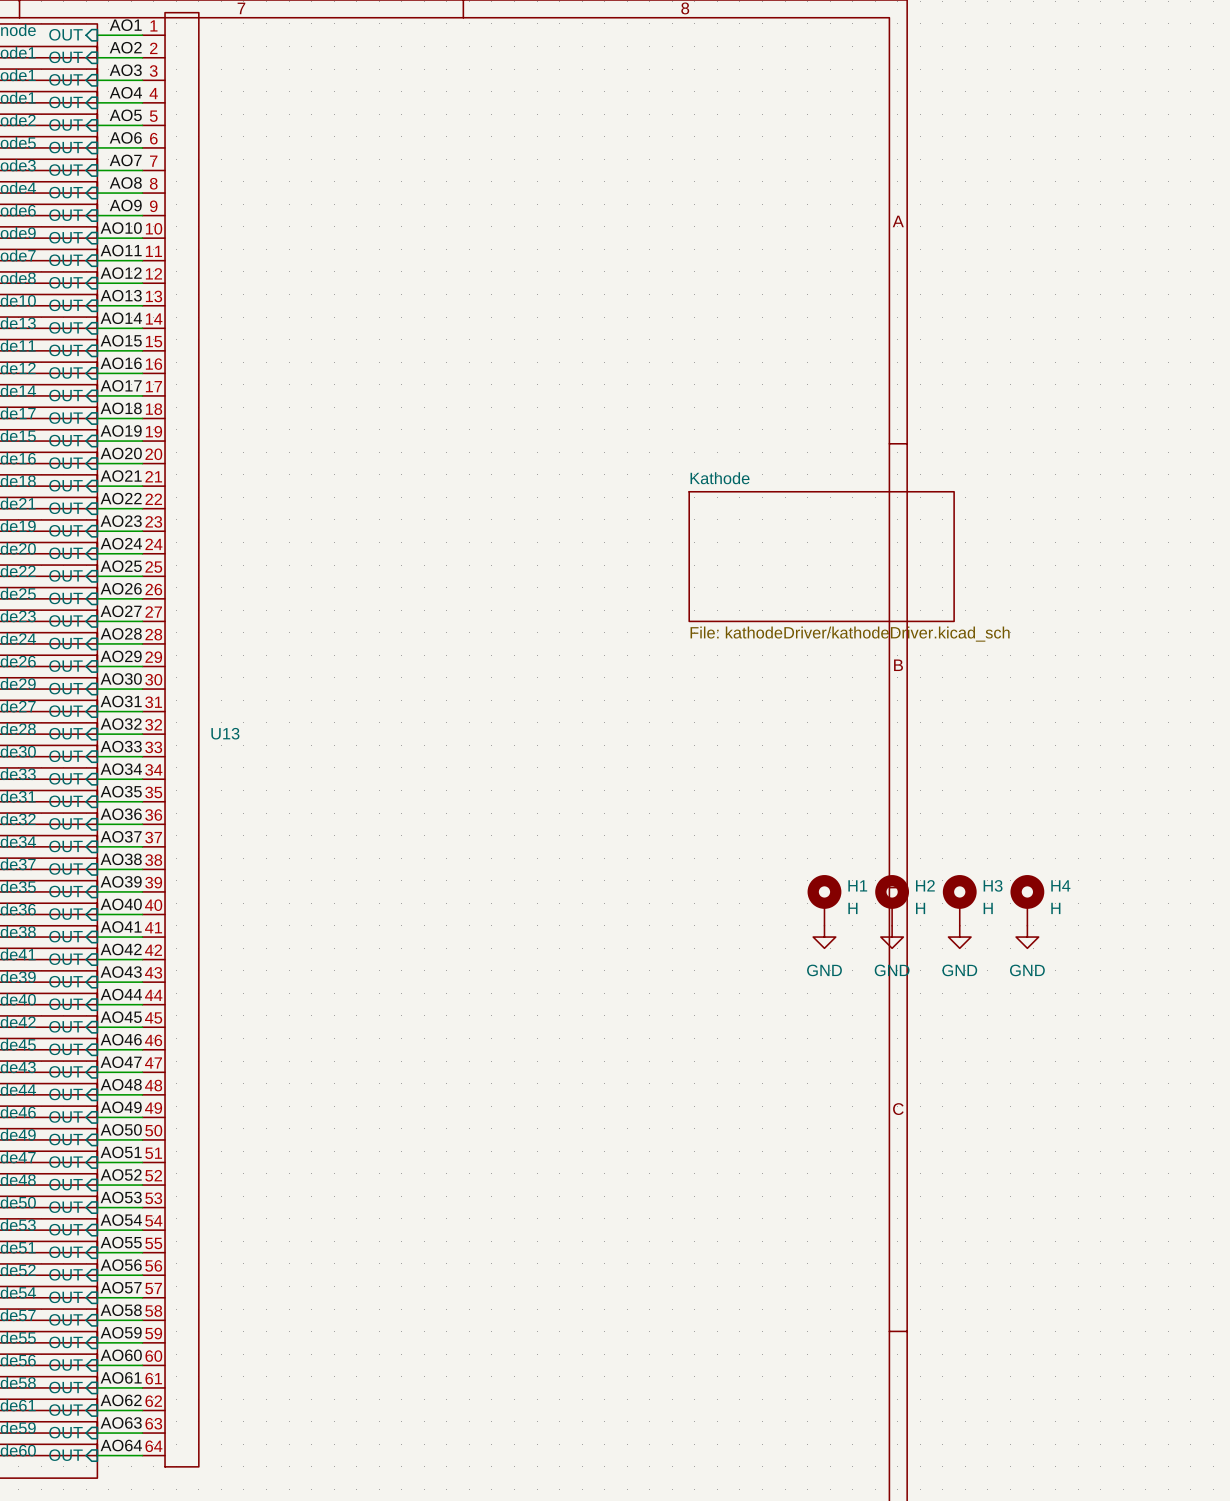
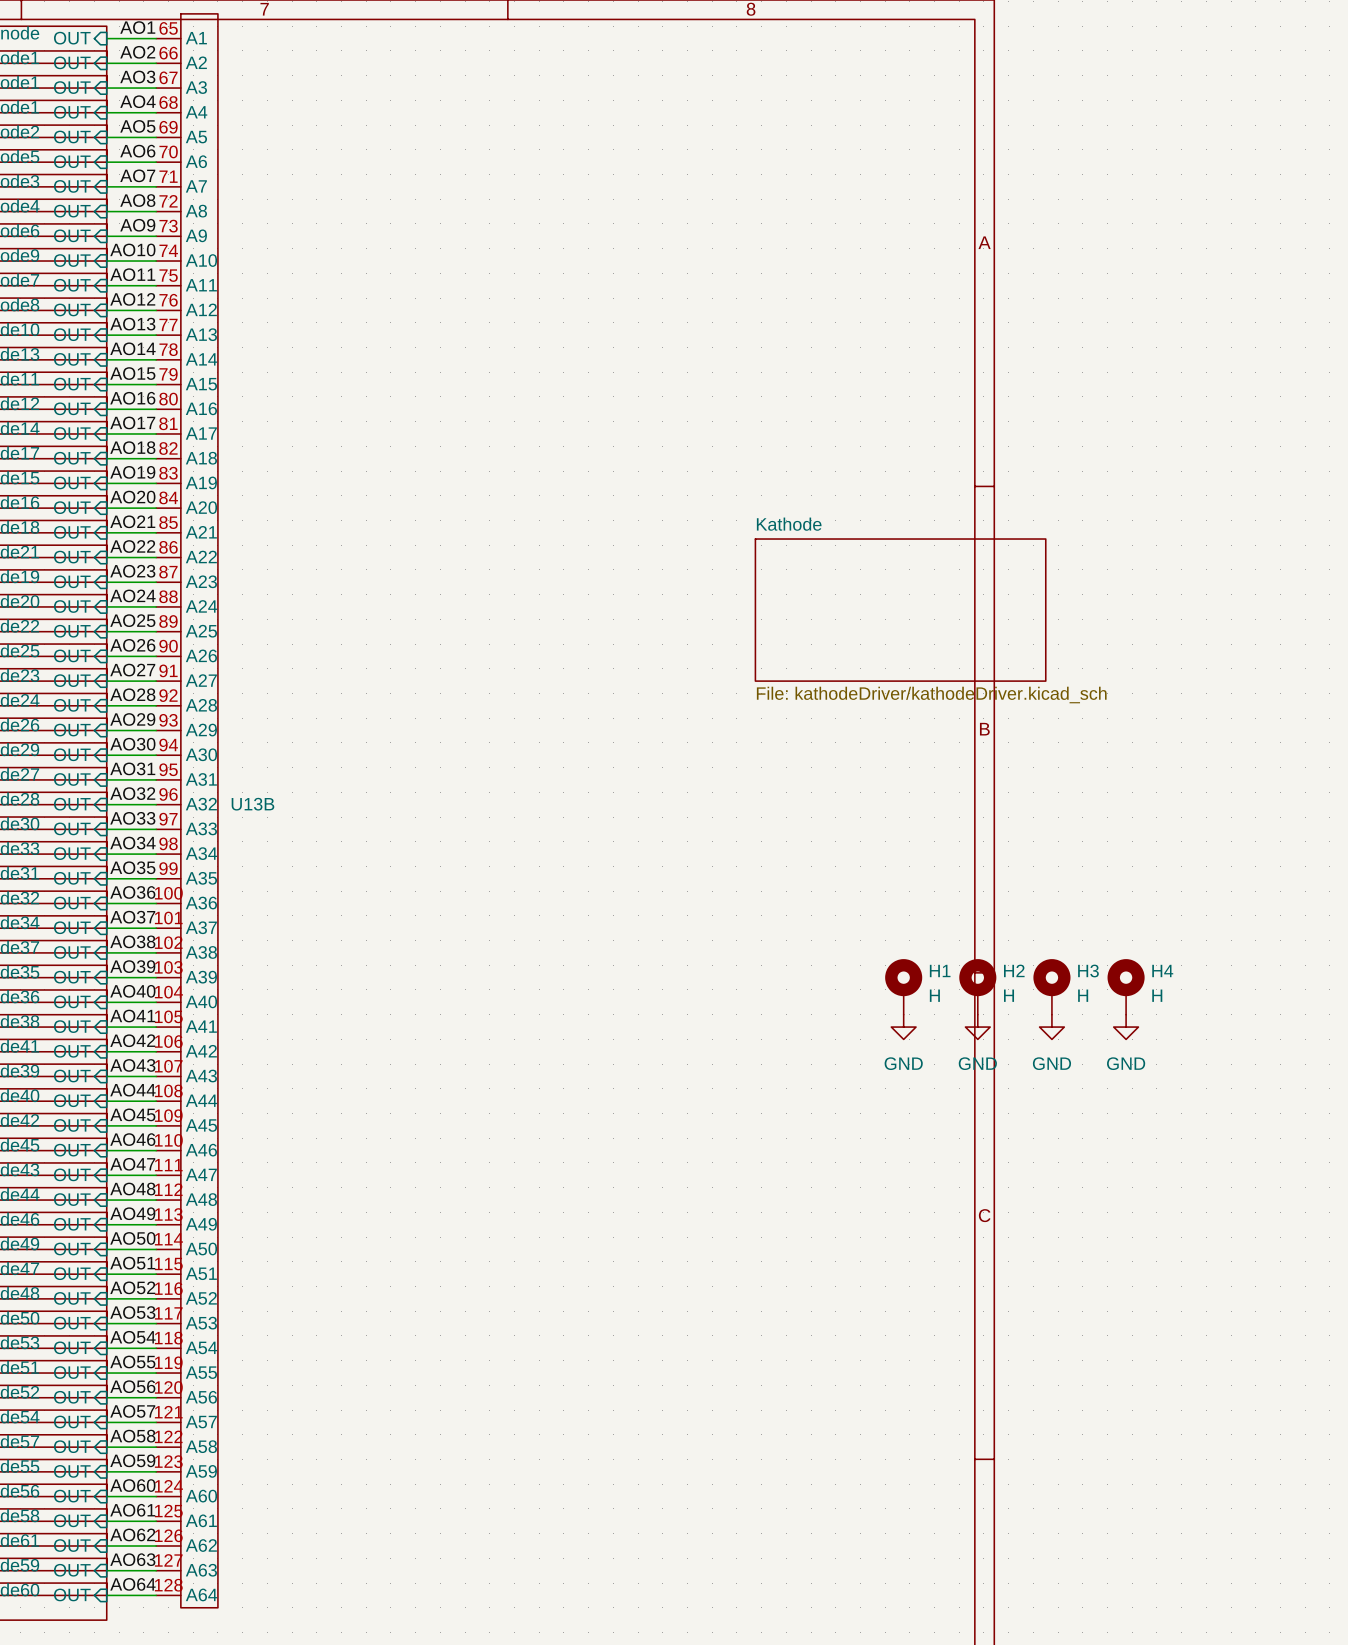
U13 symbol: [142, 12, 199, 1467] -> [156, 13, 218, 1608]
U13 name: U13 (225, 733) -> U13B (252, 804)

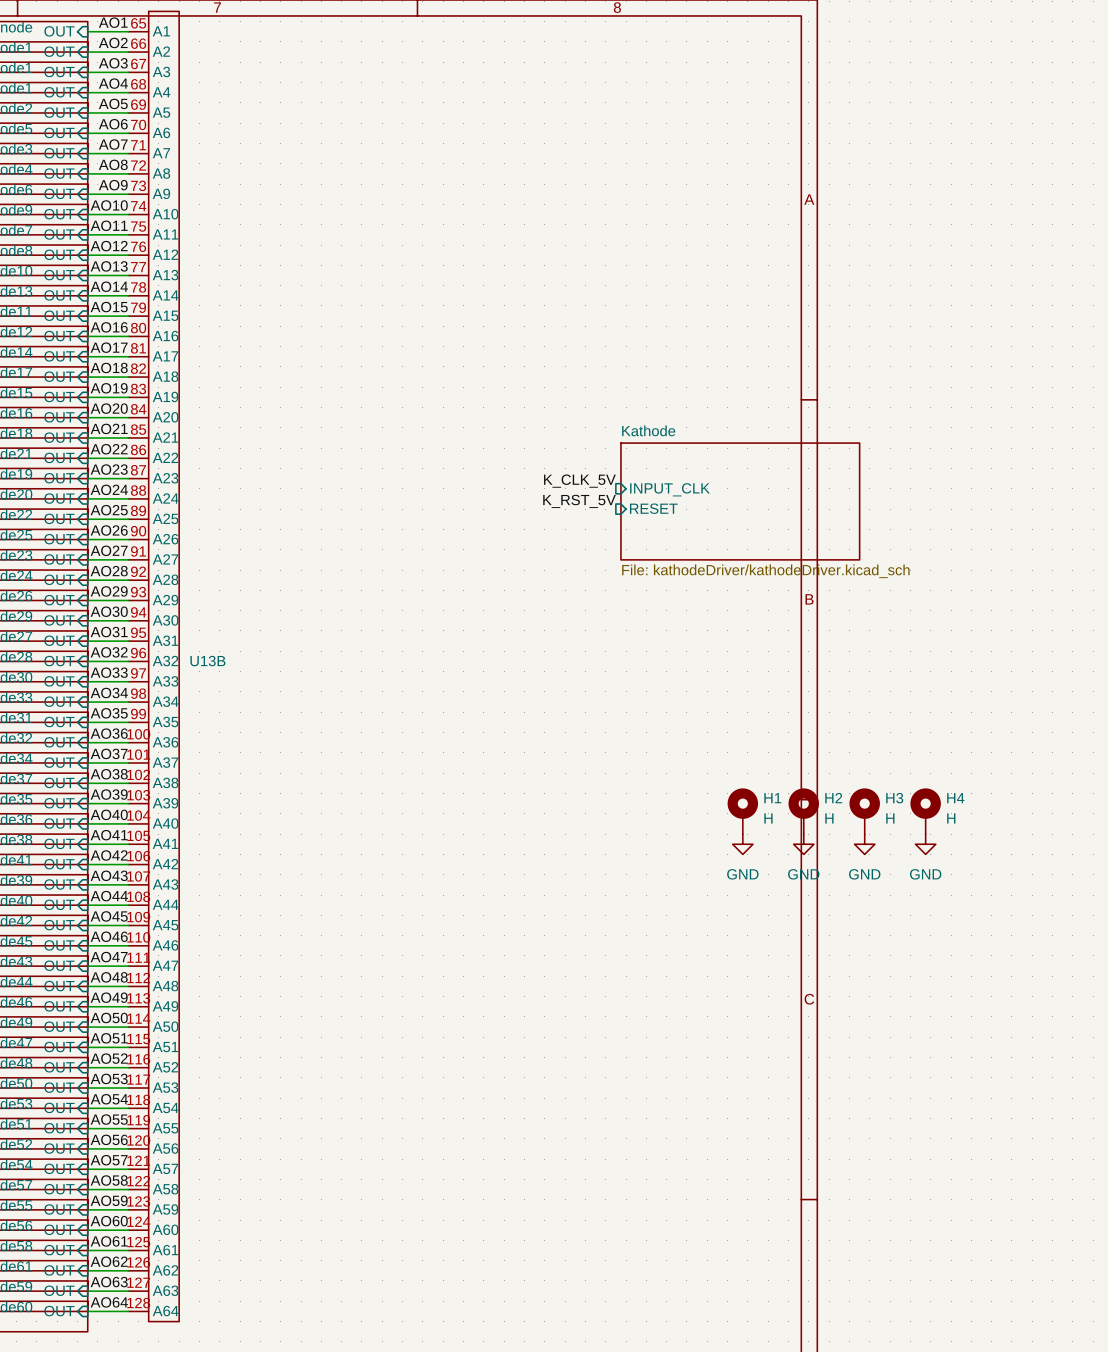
label: none -> K_CLK_5V (579, 481)
sheet pin: none -> INPUT_CLK (669, 489)
label: none -> K_RST_5V (579, 501)
sheet pin: none -> RESET (653, 508)

